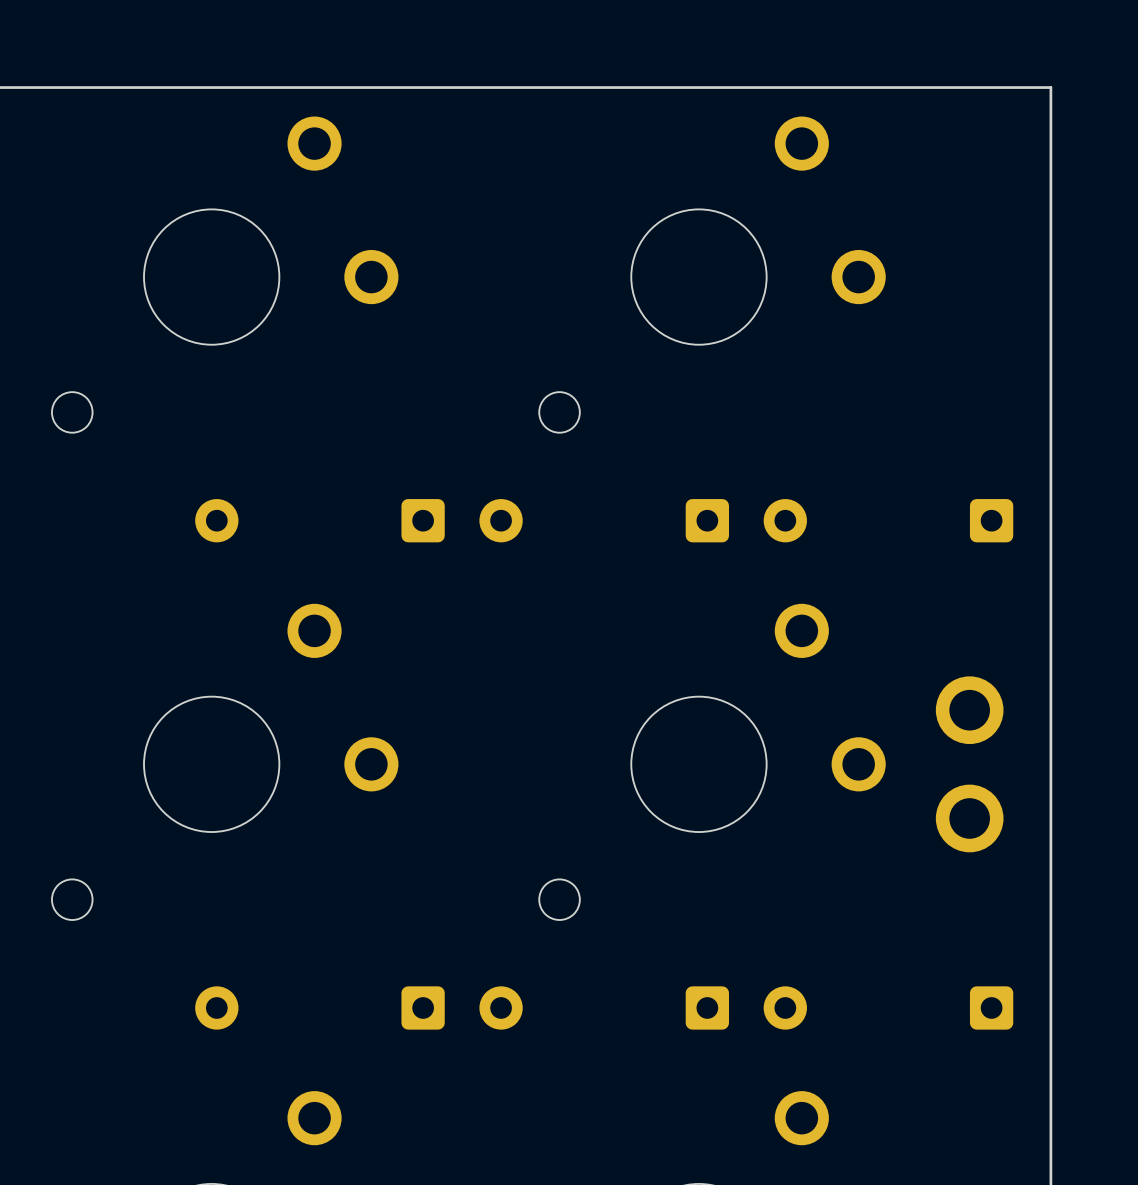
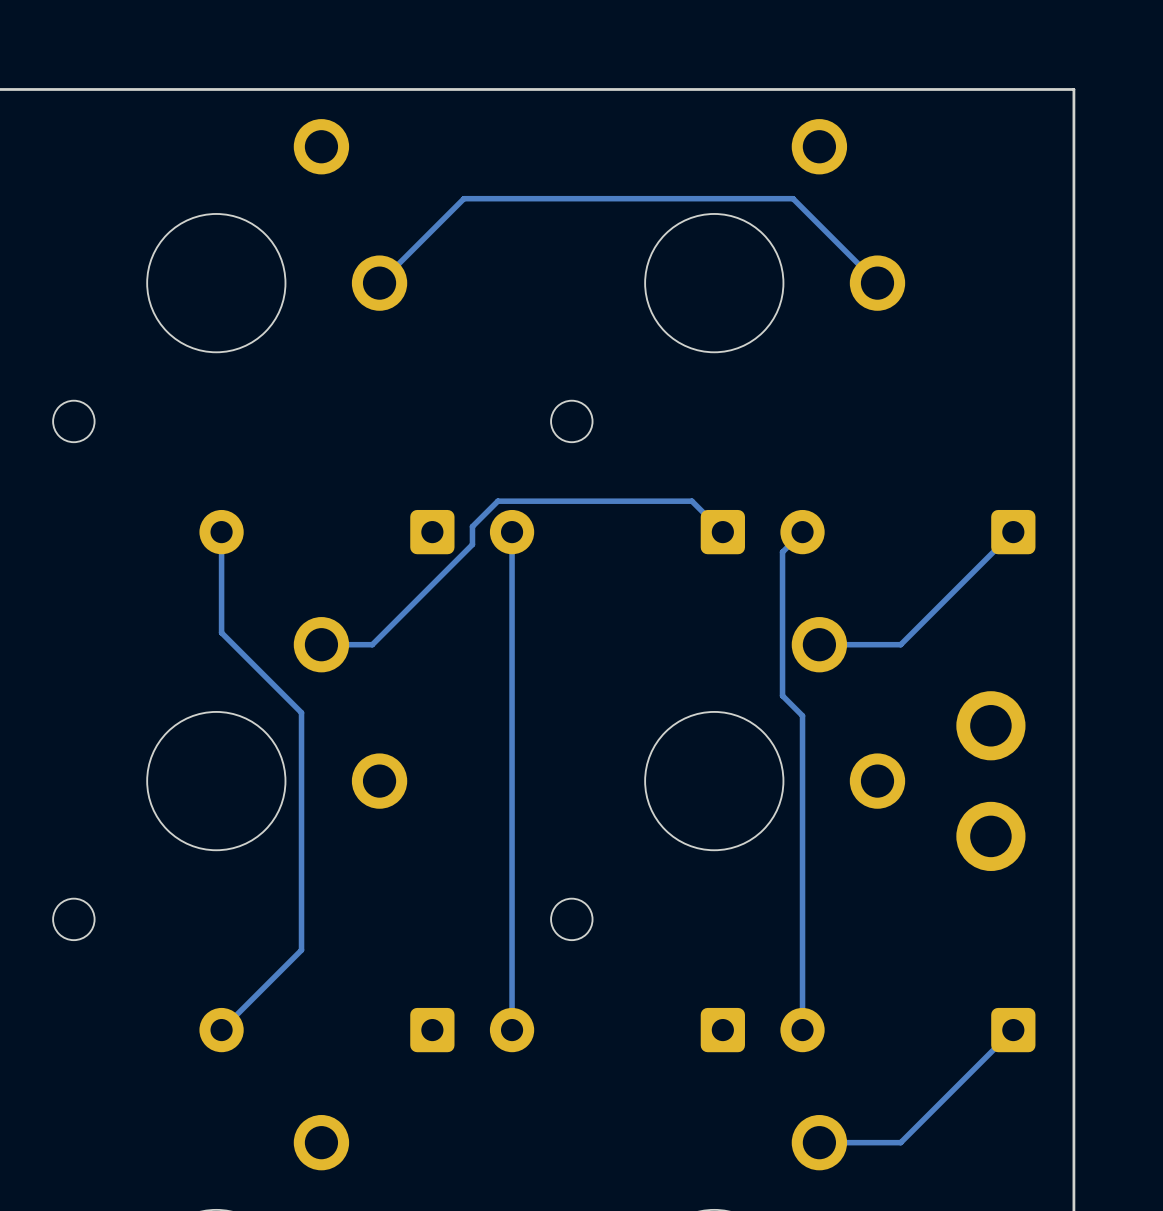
track: none -> (877, 283) (793, 198) (463, 198) (379, 283)
track: none -> (221, 532) (221, 632) (301, 712) (301, 950) (221, 1030)
track: none -> (512, 532) (512, 1030)
track: none -> (722, 532) (691, 501) (497, 501) (472, 526) (472, 544) (372, 644) (321, 644)
track: none -> (802, 532) (782, 552) (782, 695) (802, 715) (802, 1030)
track: none -> (1013, 532) (900, 644) (819, 644)
track: none -> (1013, 1030) (900, 1142) (819, 1142)

